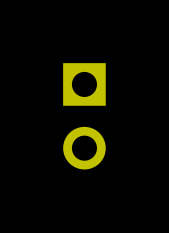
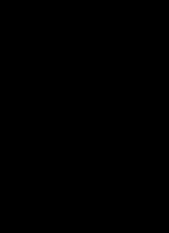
part: (84, 116) -> none

